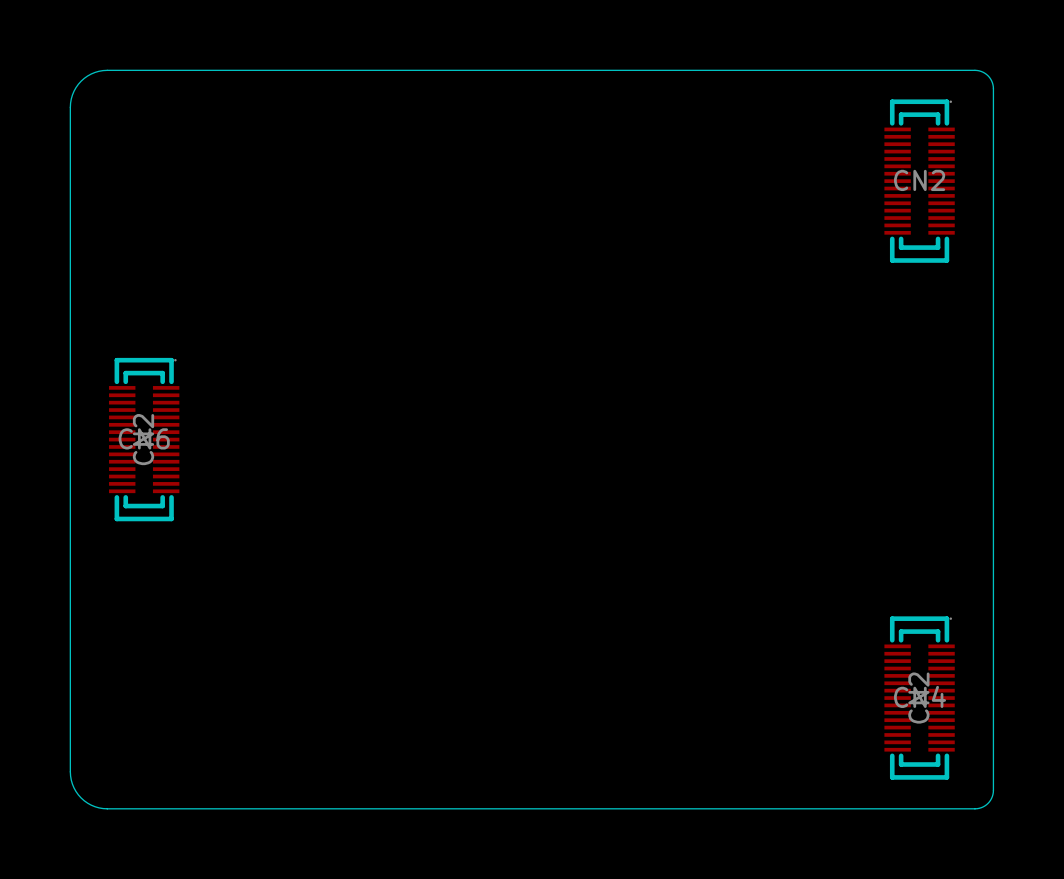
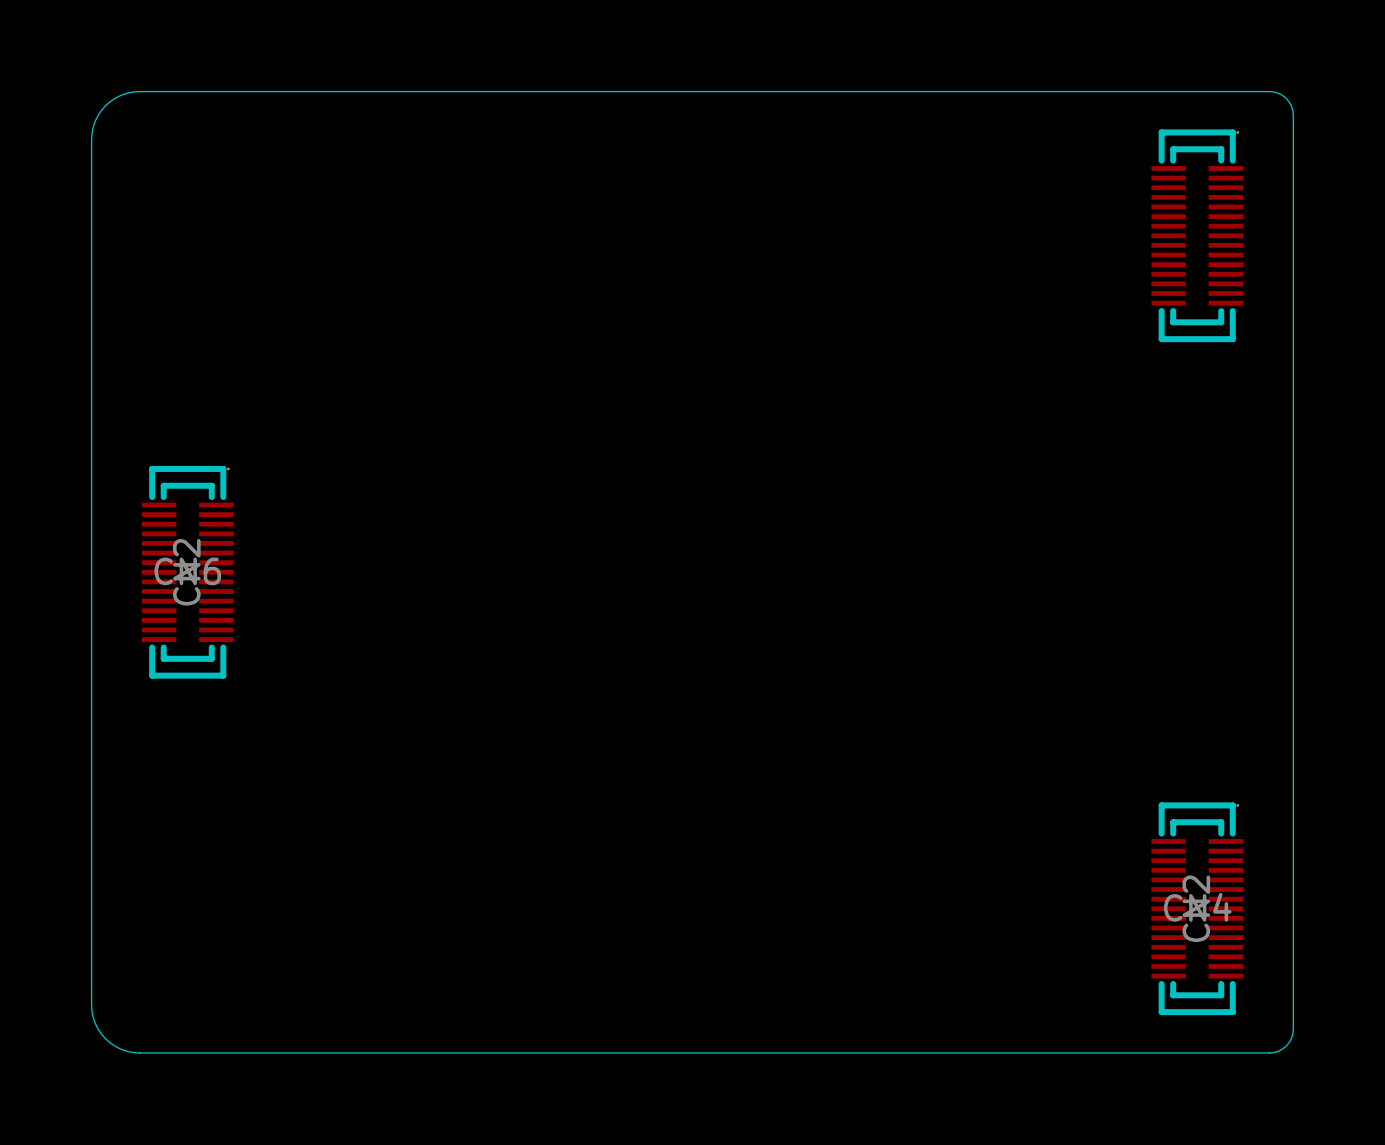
CN2 name: CN2 (919, 180) -> none

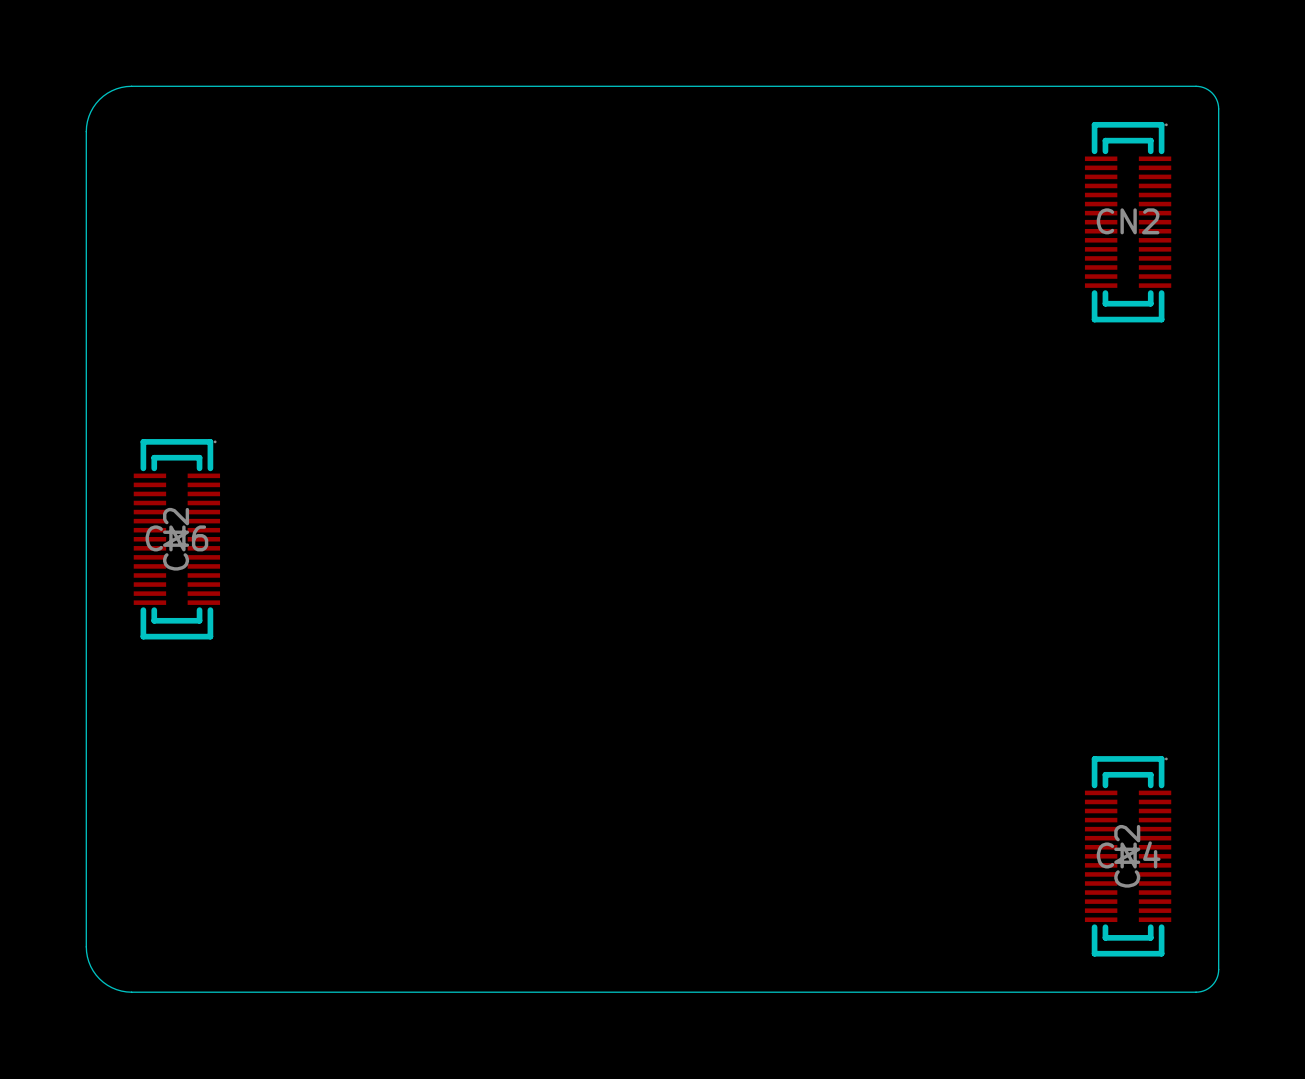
CN2 name: none -> CN2 (1128, 221)

